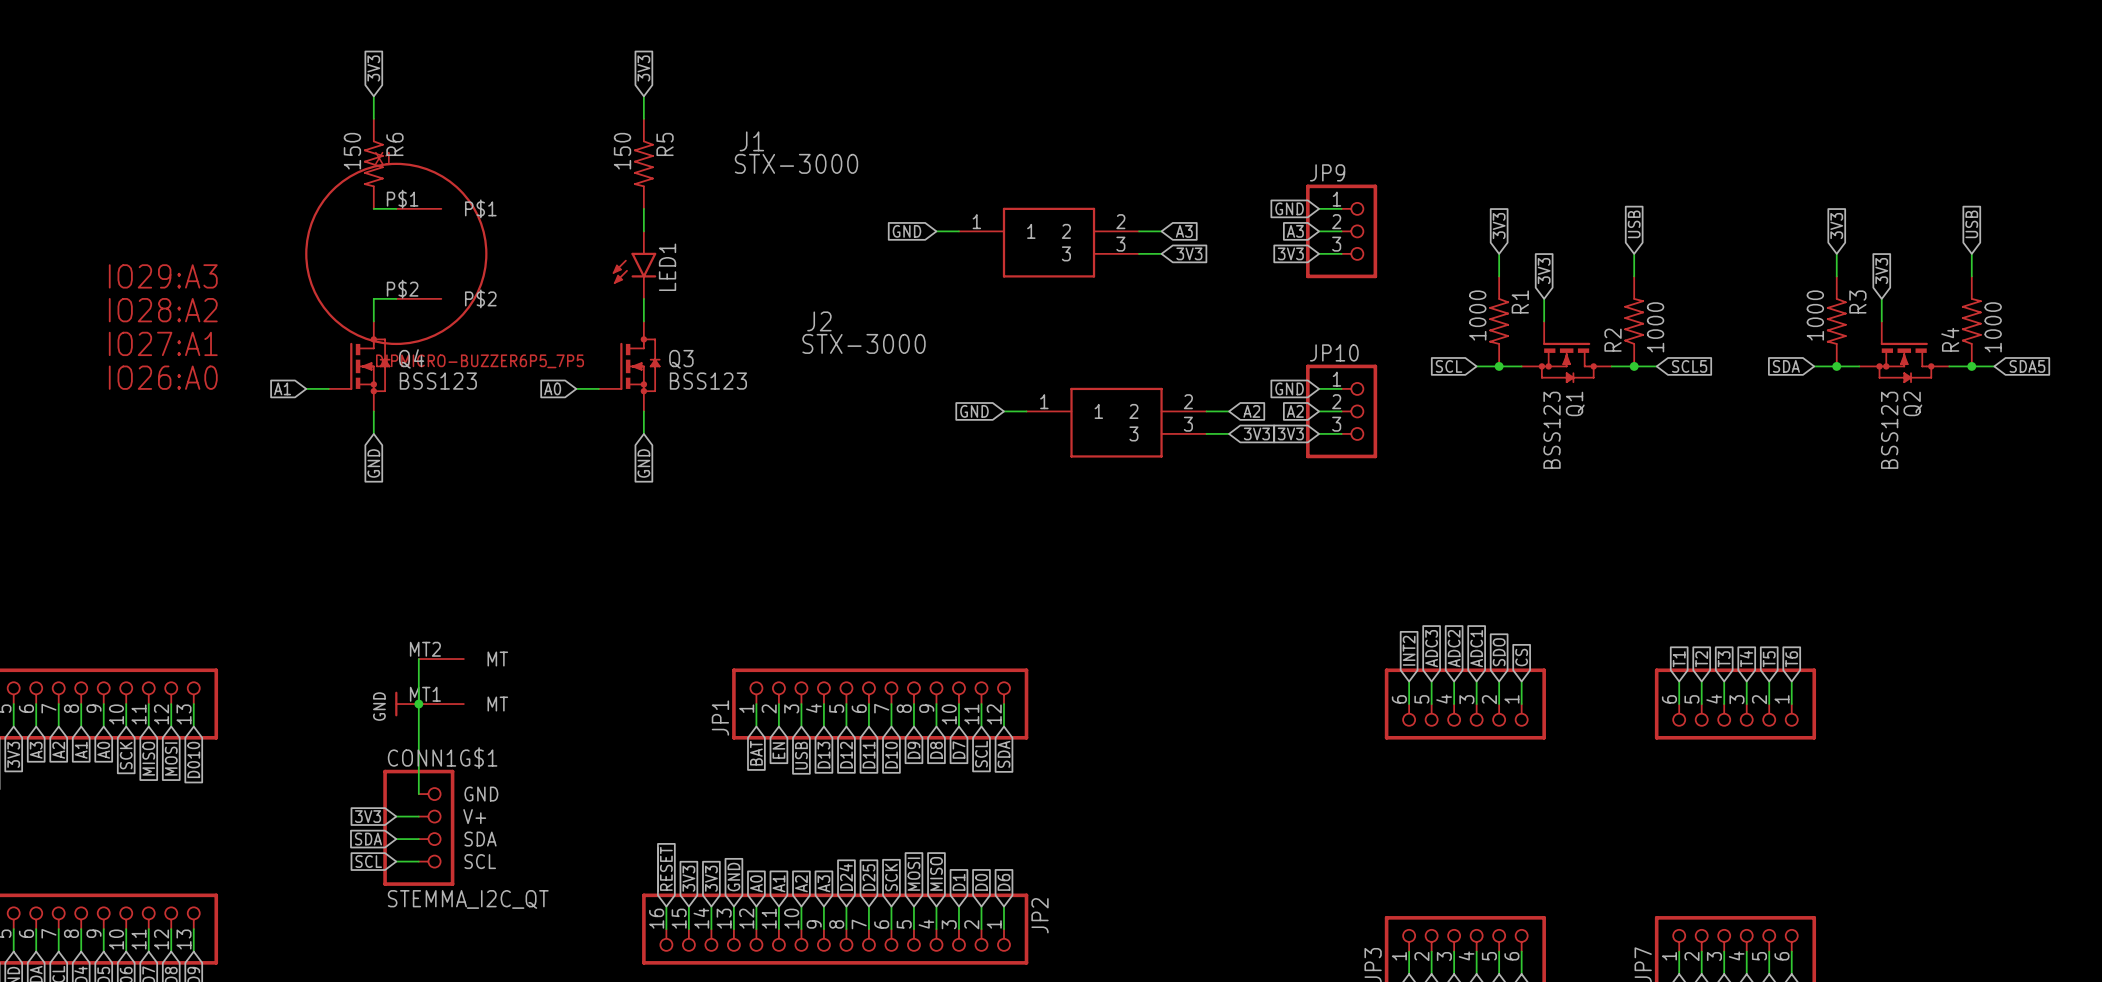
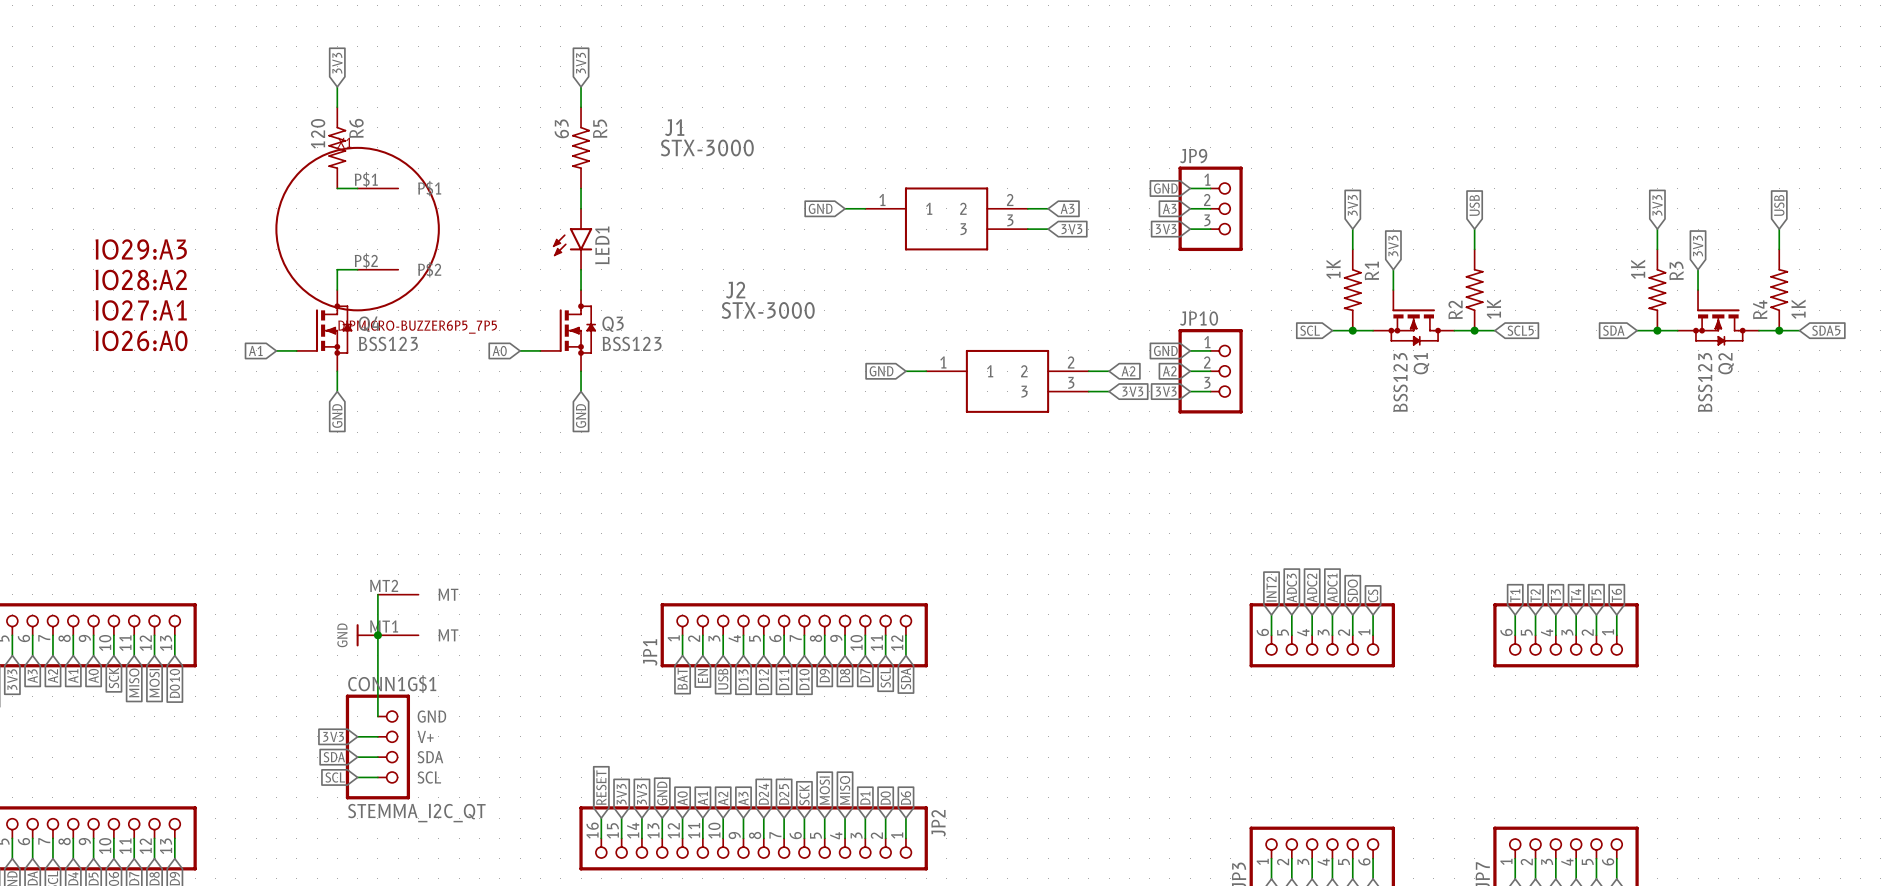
R6 value: 150 (352, 151) -> 120 (318, 133)
R5 value: 150 (622, 151) -> 63 (561, 128)
R1 value: 1000 (1477, 315) -> 1K (1333, 269)
R3 value: 1000 (1815, 315) -> 1K (1638, 269)
R2 value: 1000 (1655, 327) -> 1K (1493, 309)
R4 value: 1000 (1993, 327) -> 1K (1798, 309)

